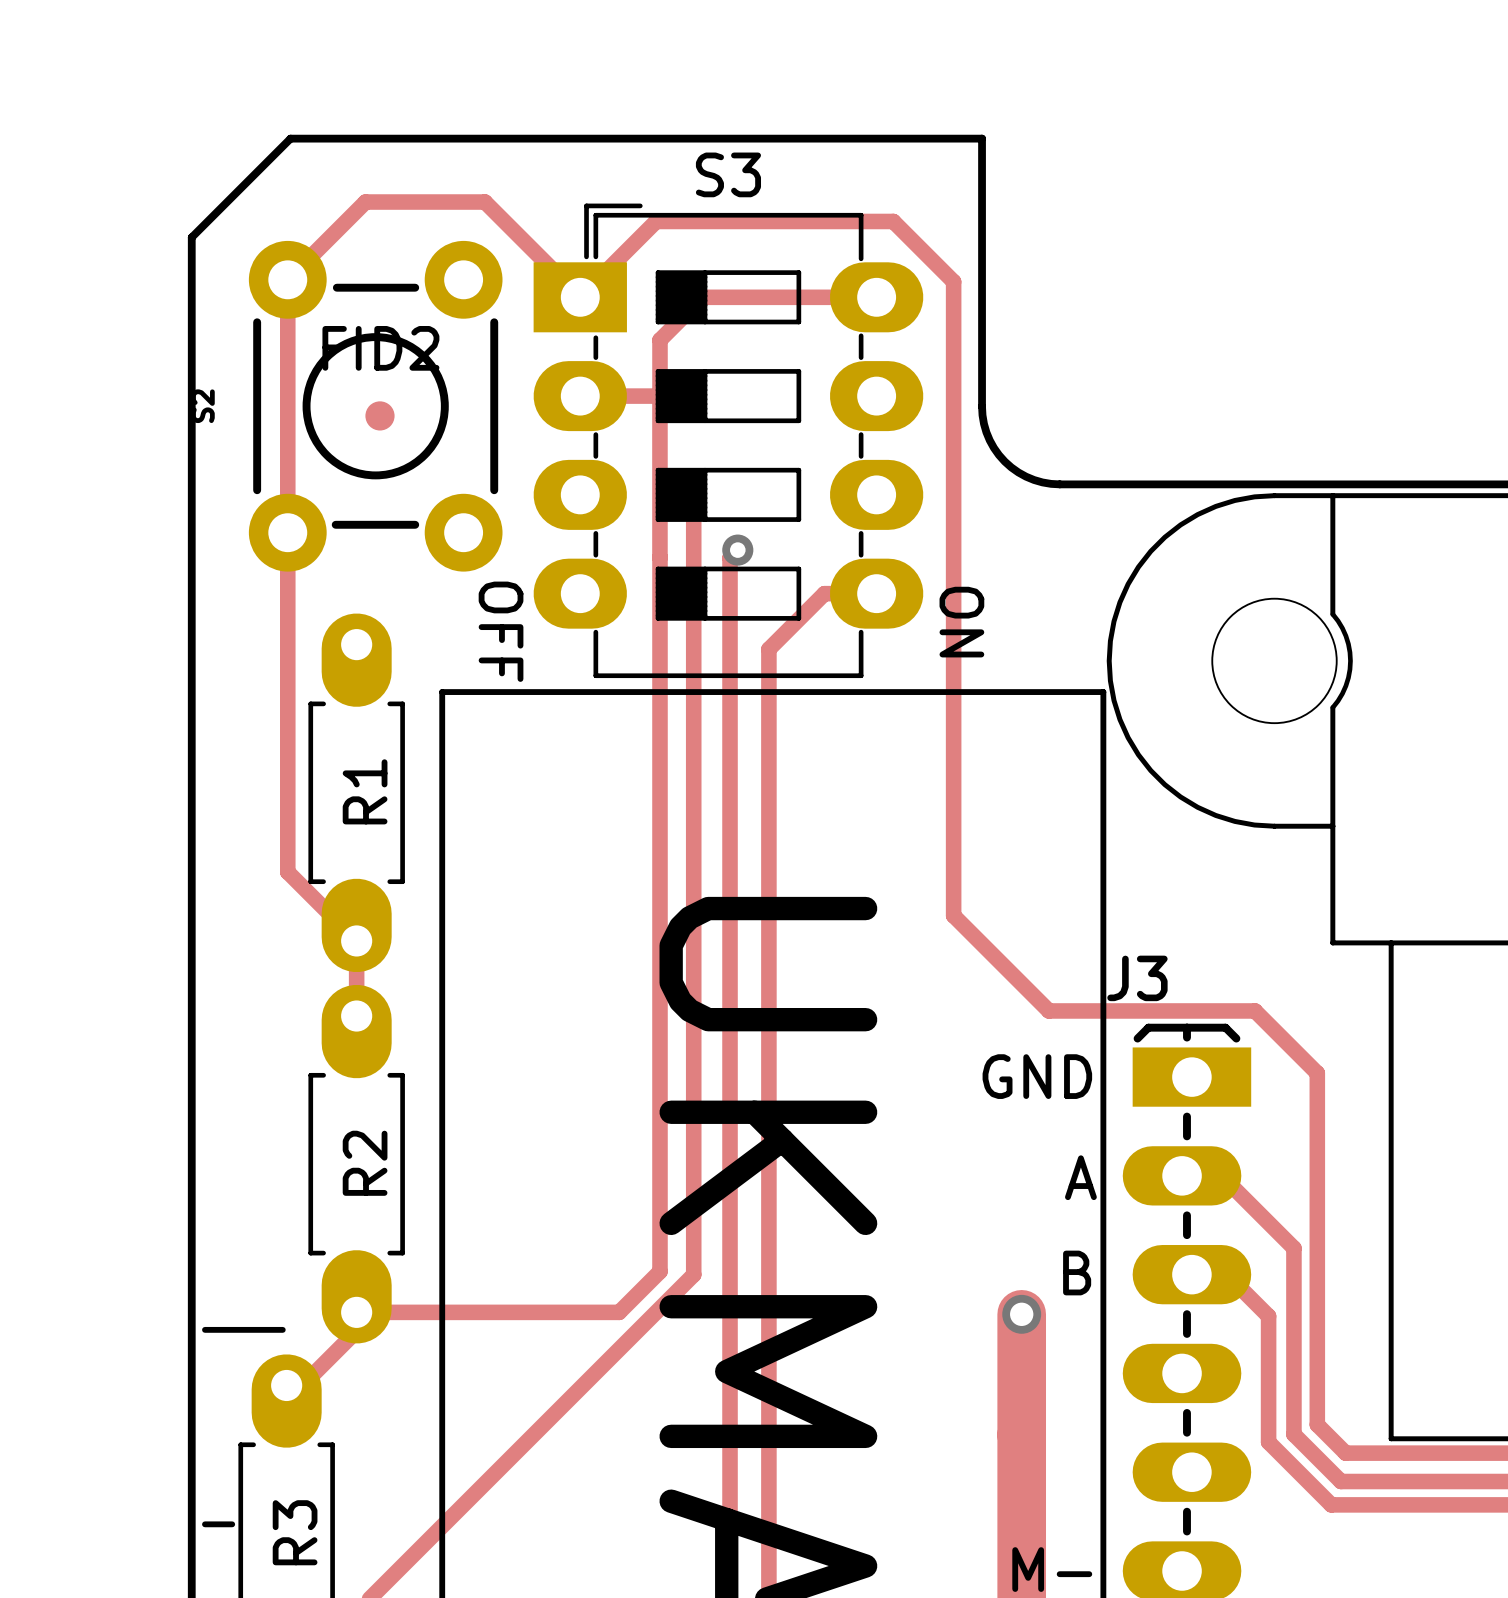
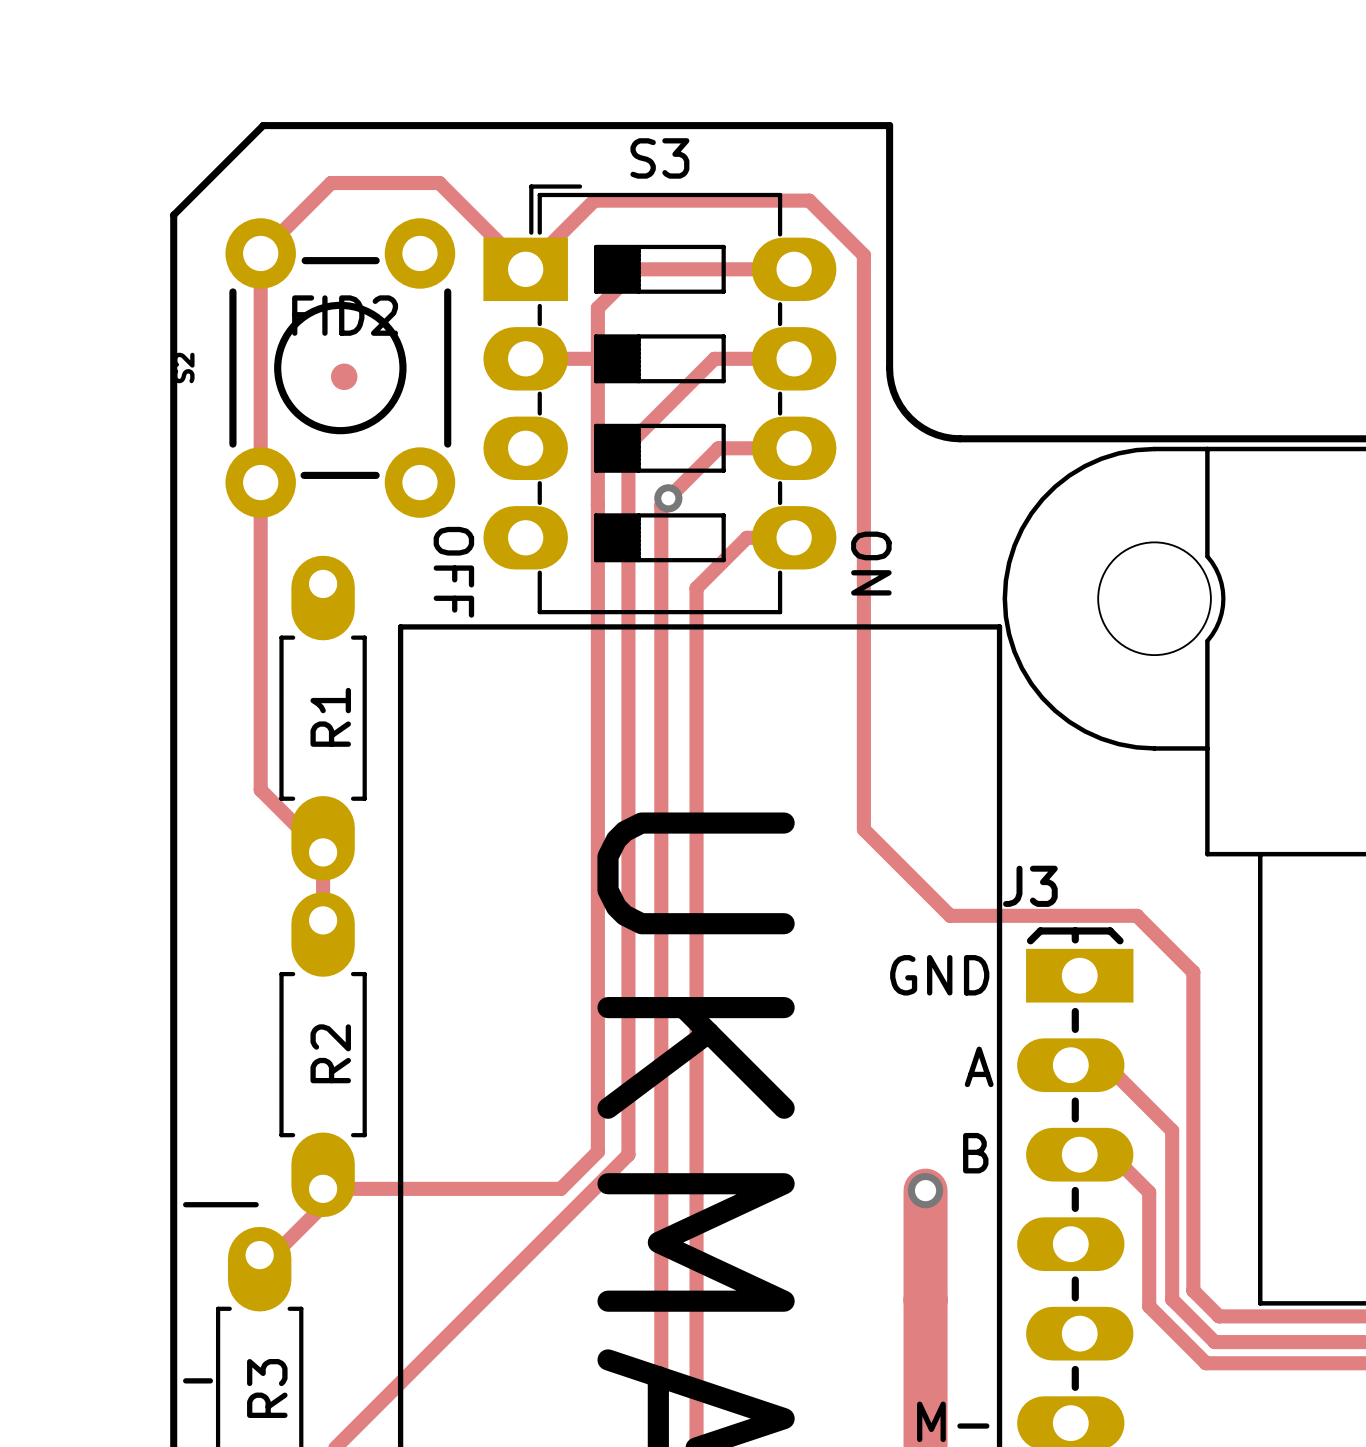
track: none -> (794, 358) (714, 358) (624, 449)
track: none -> (794, 448) (718, 448) (668, 498)

